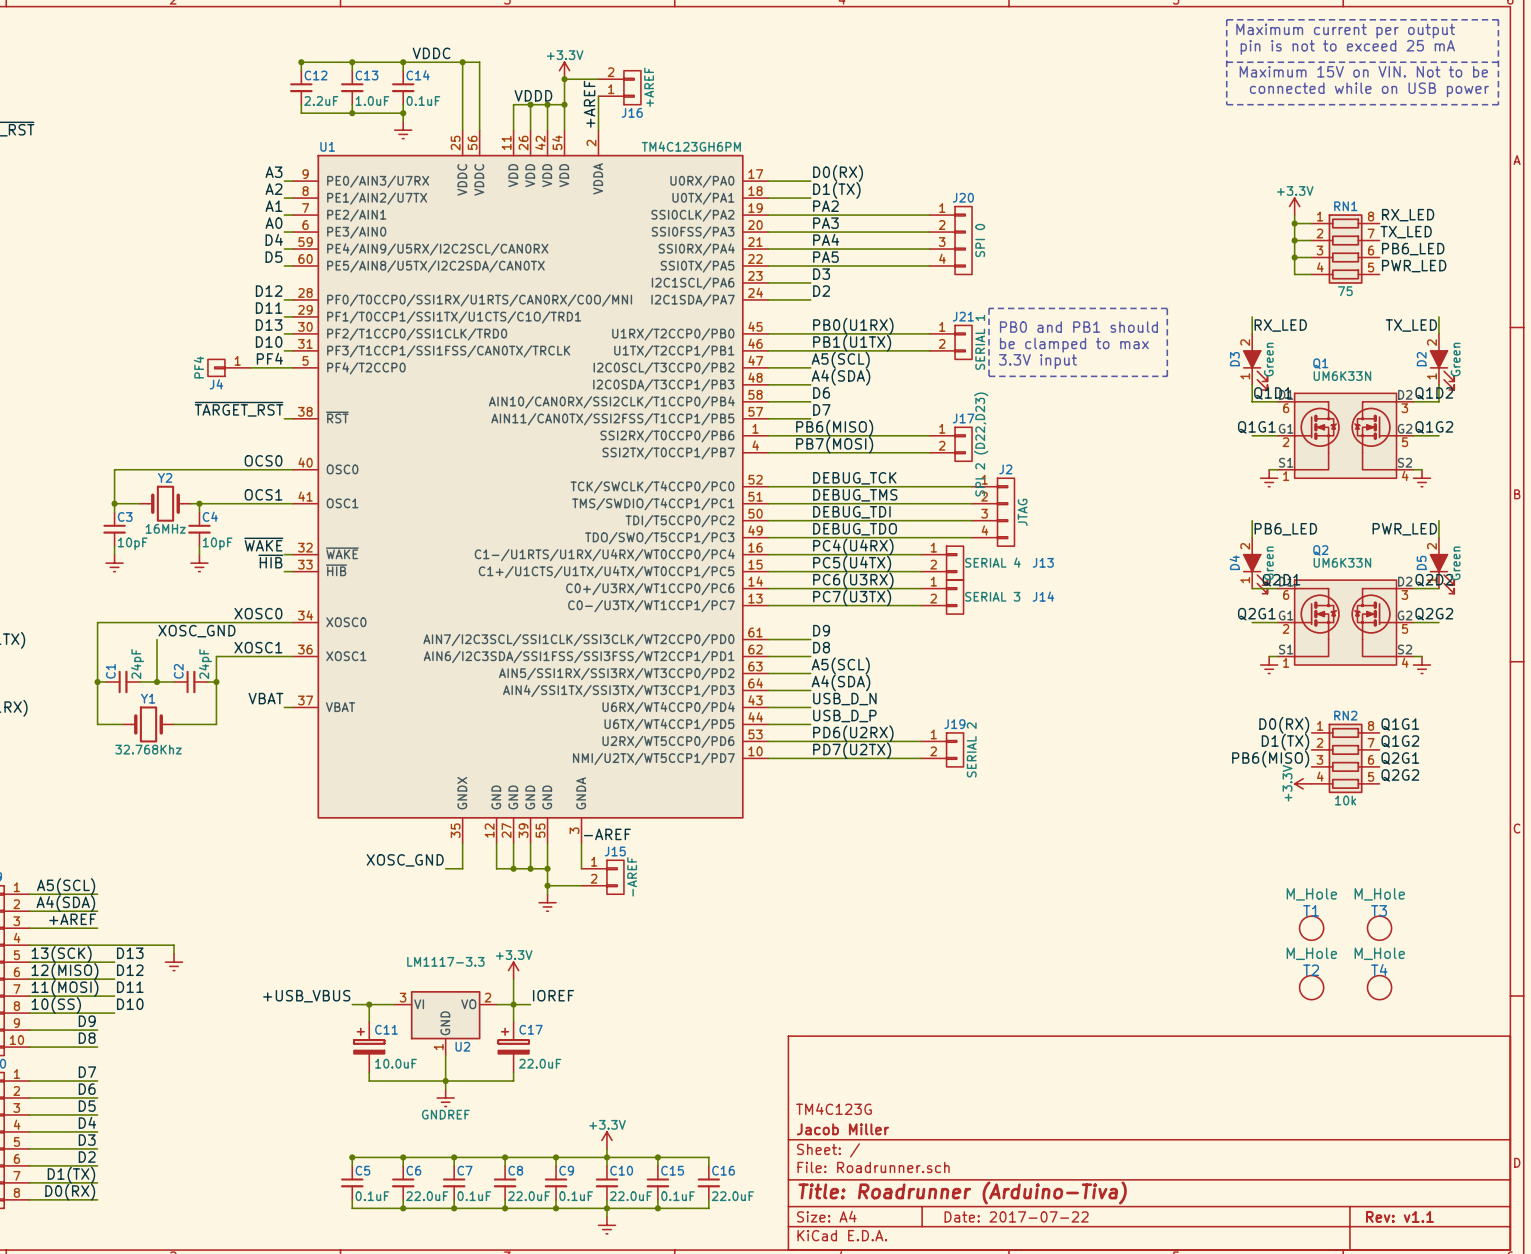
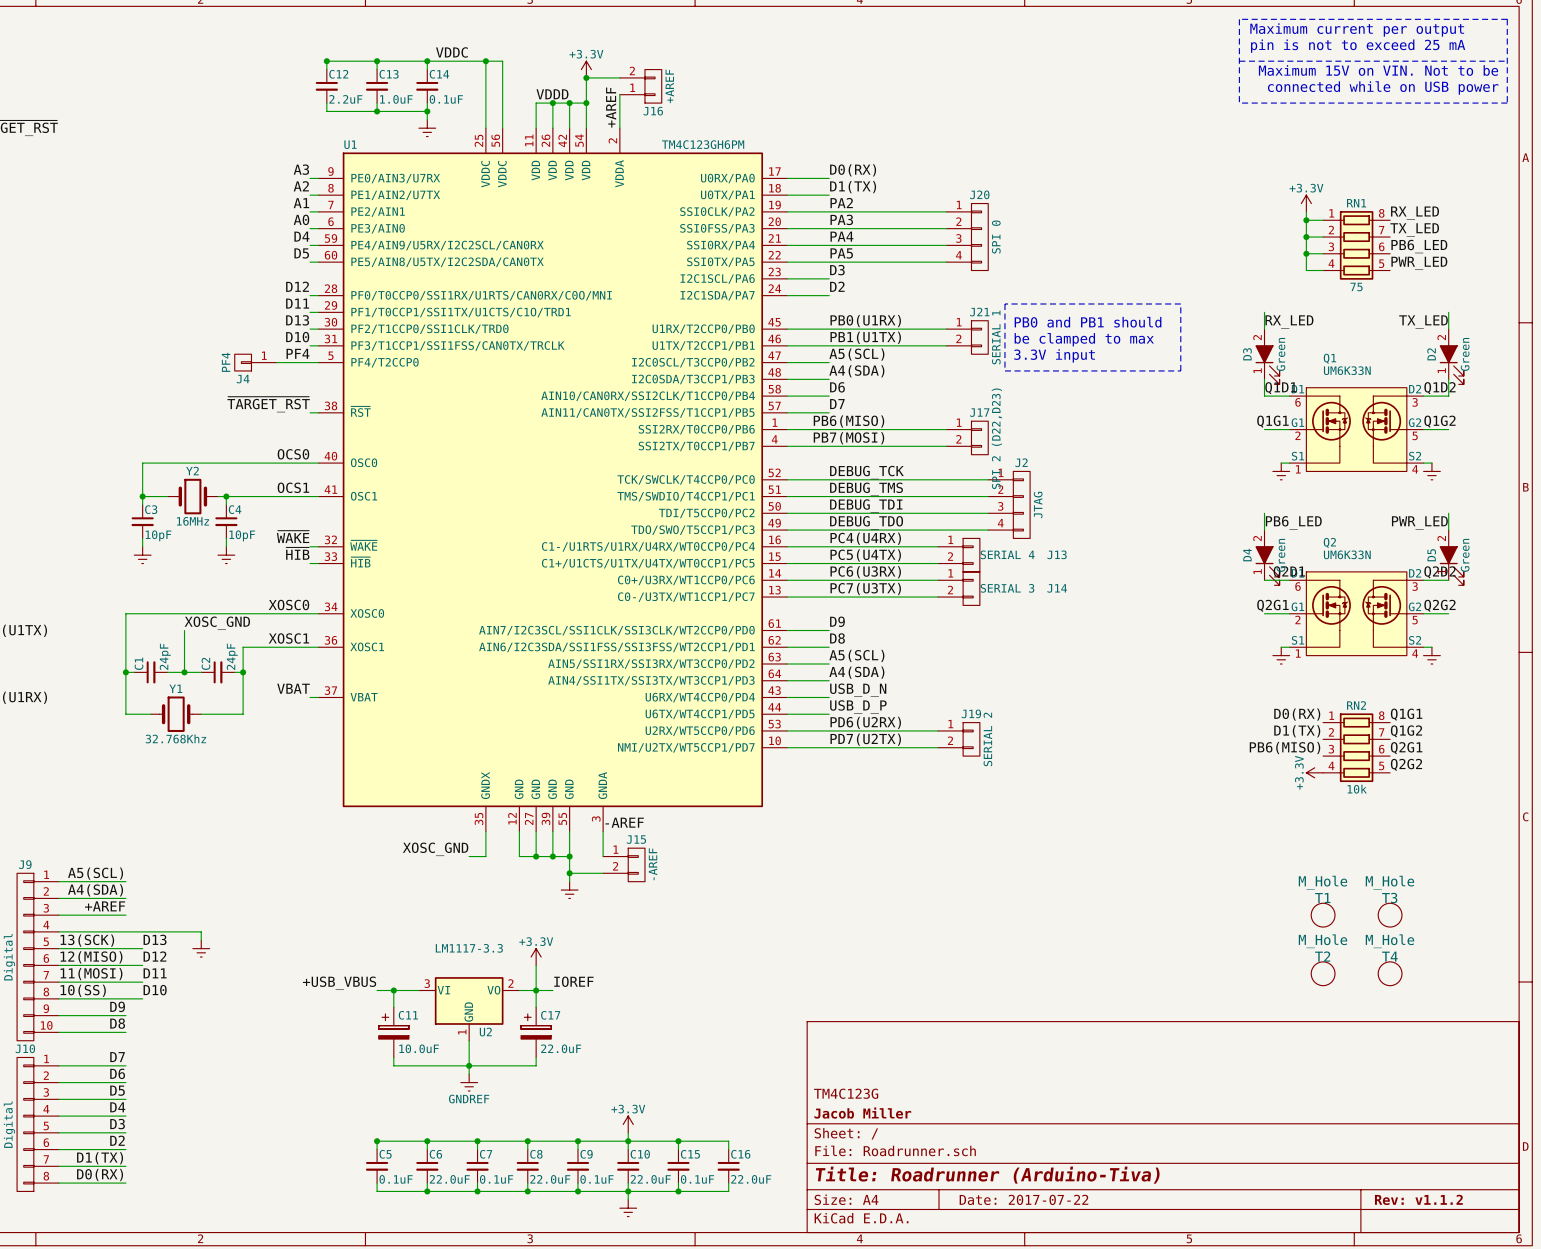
title block: Rev: v1.1 (1399, 1216) -> Rev: v1.1.2 (1418, 1199)

